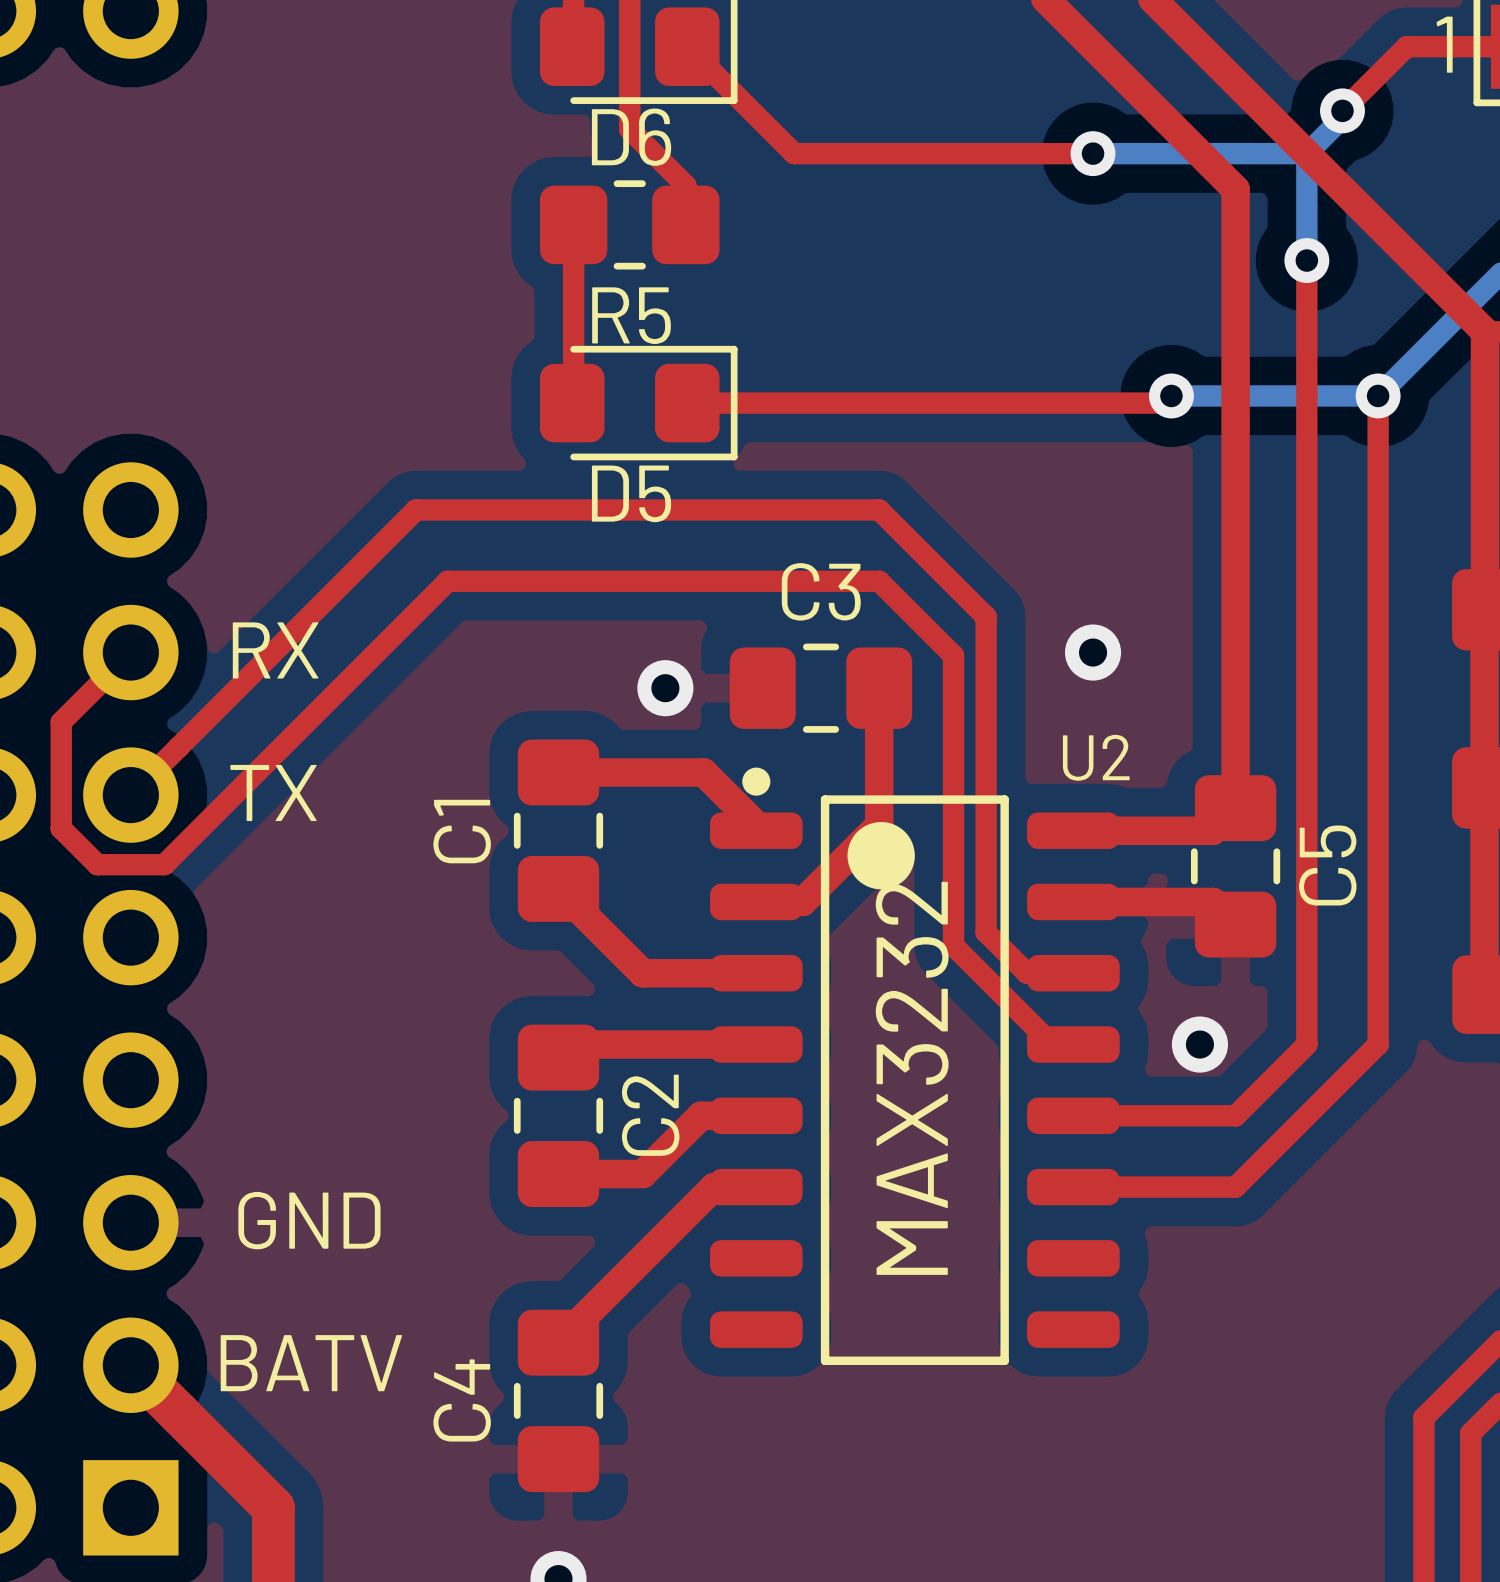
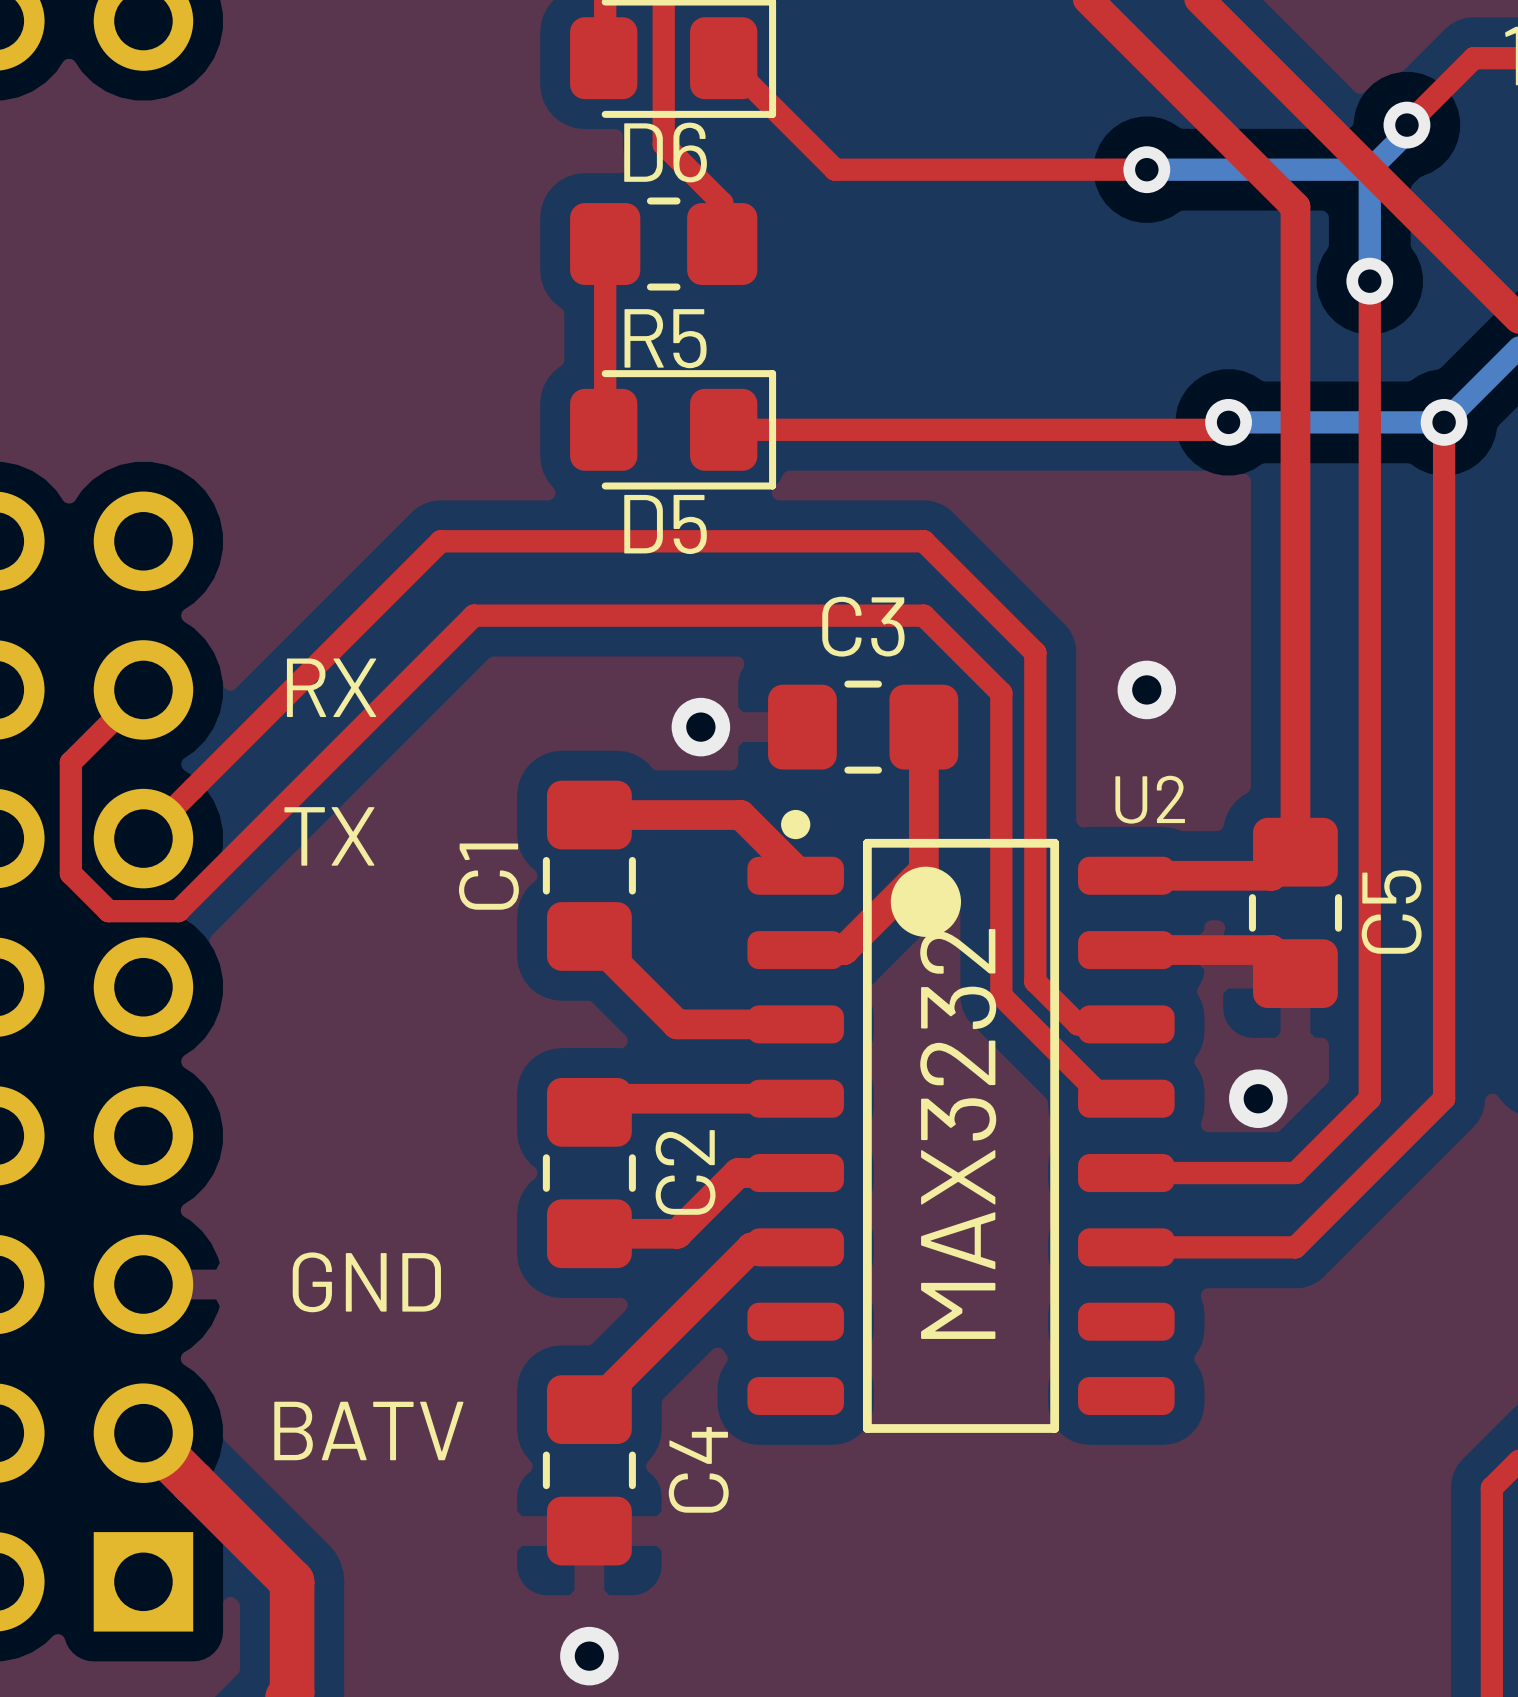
text position: RX (275, 650) -> RX (331, 687)
text position: TX (273, 792) -> TX (329, 836)
text position: GND (309, 1220) -> GND (366, 1282)
text position: BATV (311, 1363) -> BATV (368, 1430)
C4 name position: C4 (462, 1400) -> C4 (698, 1469)

